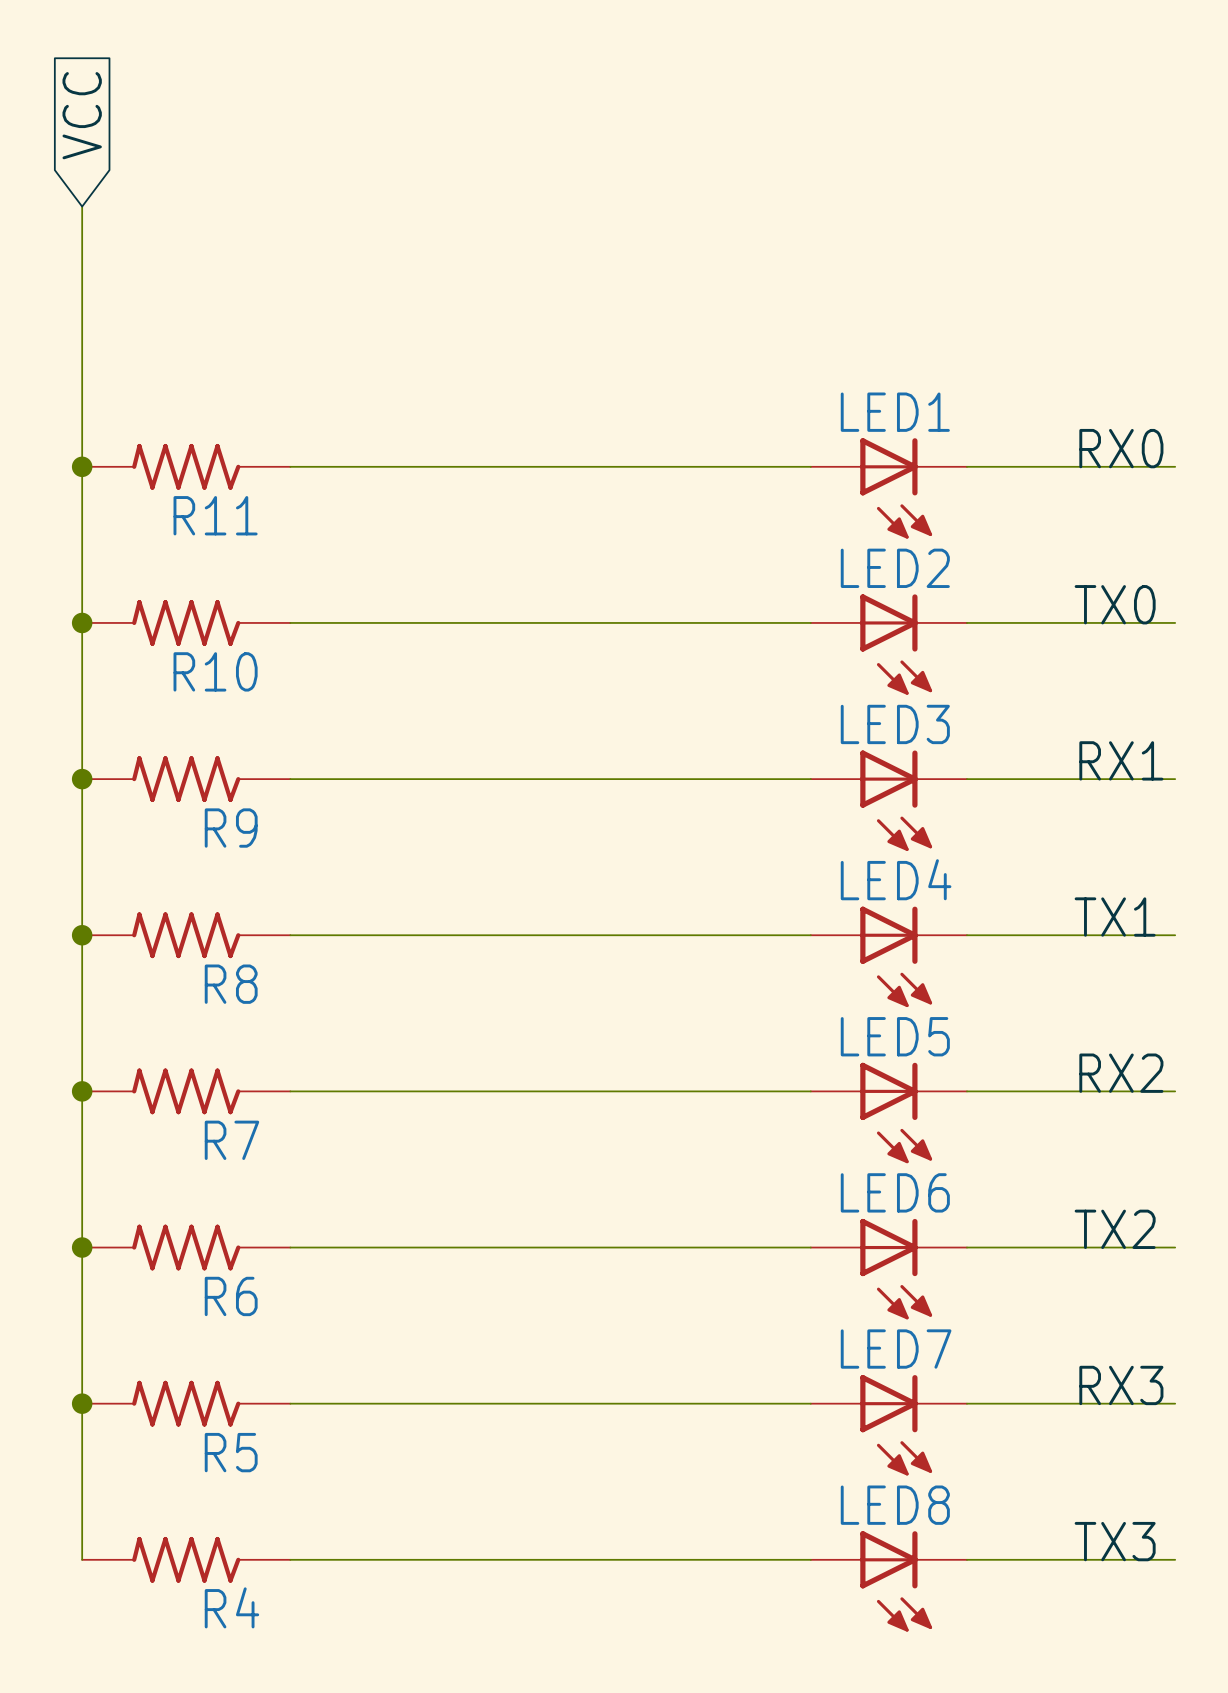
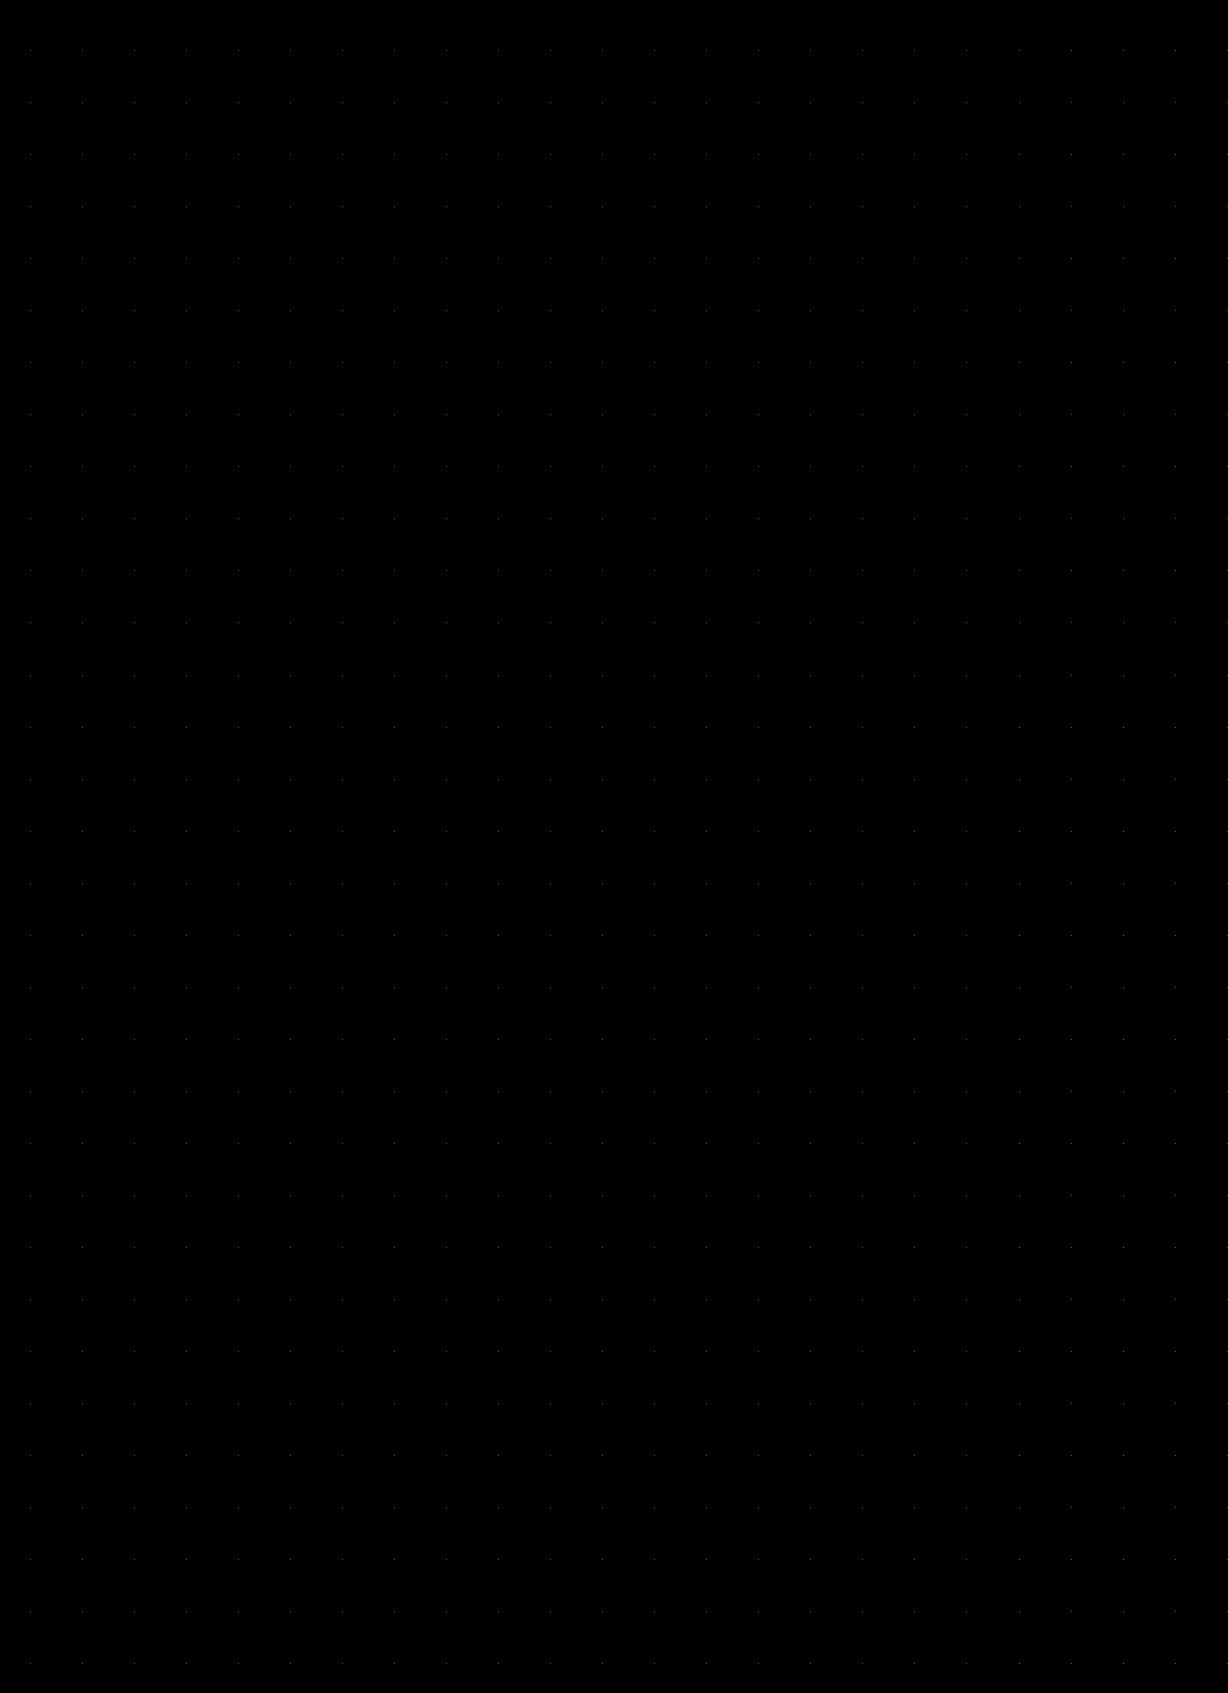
global label: VCC (82, 115) -> none
wire: (82, 206) (82, 1559) -> none
label: RX0 (1121, 448) -> none
junction: (82, 466) -> none
R11: (186, 466) -> none
wire: (290, 466) (810, 466) -> none
wire: (966, 466) (1175, 466) -> none
LED1: (888, 488) -> none
label: TX0 (1115, 604) -> none
junction: (82, 622) -> none
R10: (186, 622) -> none
wire: (290, 622) (810, 622) -> none
wire: (966, 622) (1175, 622) -> none
LED2: (888, 644) -> none
label: RX1 (1121, 760) -> none
junction: (82, 779) -> none
R9: (186, 779) -> none
wire: (290, 779) (810, 779) -> none
wire: (966, 779) (1175, 779) -> none
LED3: (888, 800) -> none
label: TX1 (1115, 917) -> none
junction: (82, 935) -> none
R8: (186, 935) -> none
wire: (290, 935) (810, 935) -> none
wire: (966, 935) (1175, 935) -> none
LED4: (888, 956) -> none
label: RX2 (1121, 1073) -> none
junction: (82, 1091) -> none
R7: (186, 1091) -> none
wire: (290, 1091) (810, 1091) -> none
wire: (966, 1091) (1175, 1091) -> none
LED5: (888, 1112) -> none
label: TX2 (1115, 1229) -> none
junction: (82, 1247) -> none
R6: (186, 1247) -> none
wire: (290, 1247) (810, 1247) -> none
wire: (966, 1247) (1175, 1247) -> none
LED6: (888, 1269) -> none
label: RX3 (1121, 1385) -> none
junction: (82, 1403) -> none
R5: (186, 1403) -> none
wire: (290, 1403) (810, 1403) -> none
wire: (966, 1403) (1175, 1403) -> none
LED7: (888, 1425) -> none
label: TX3 (1115, 1541) -> none
R4: (186, 1559) -> none
wire: (290, 1559) (810, 1559) -> none
wire: (966, 1559) (1175, 1559) -> none
LED8: (888, 1581) -> none

